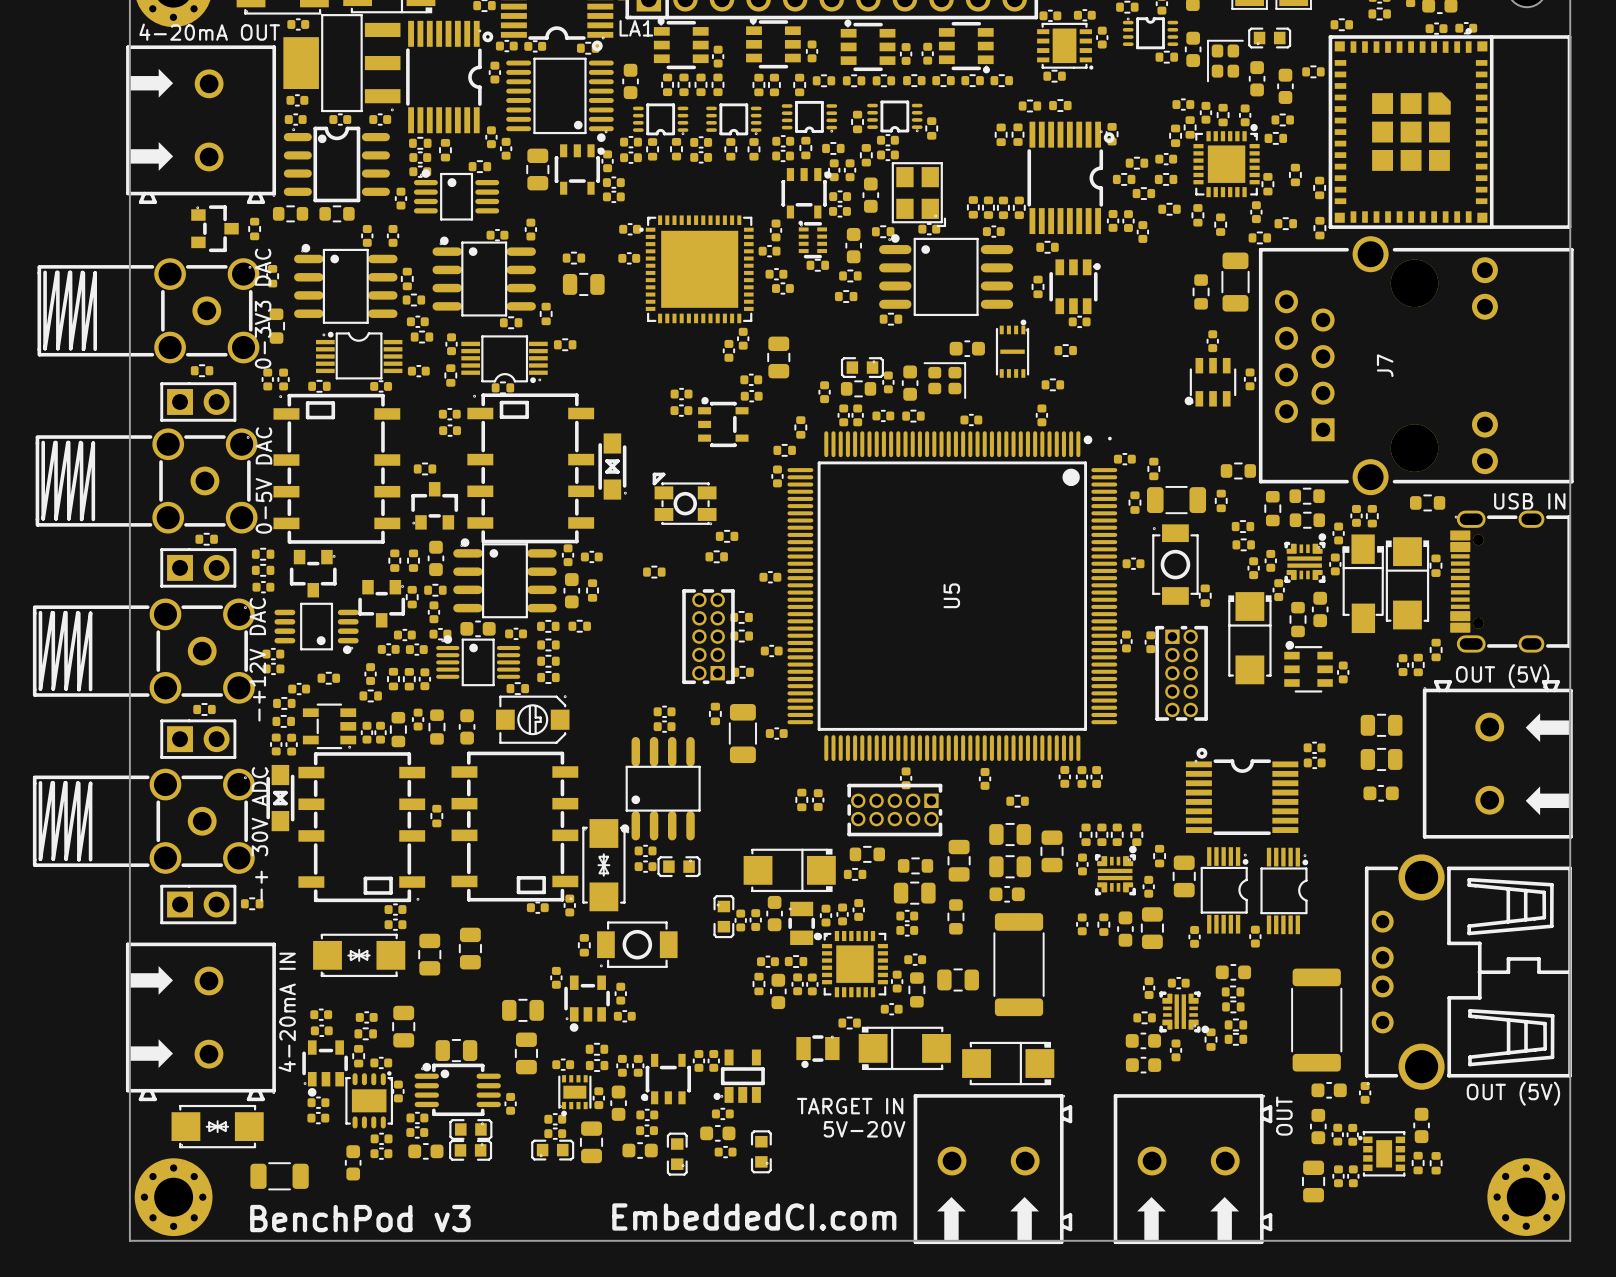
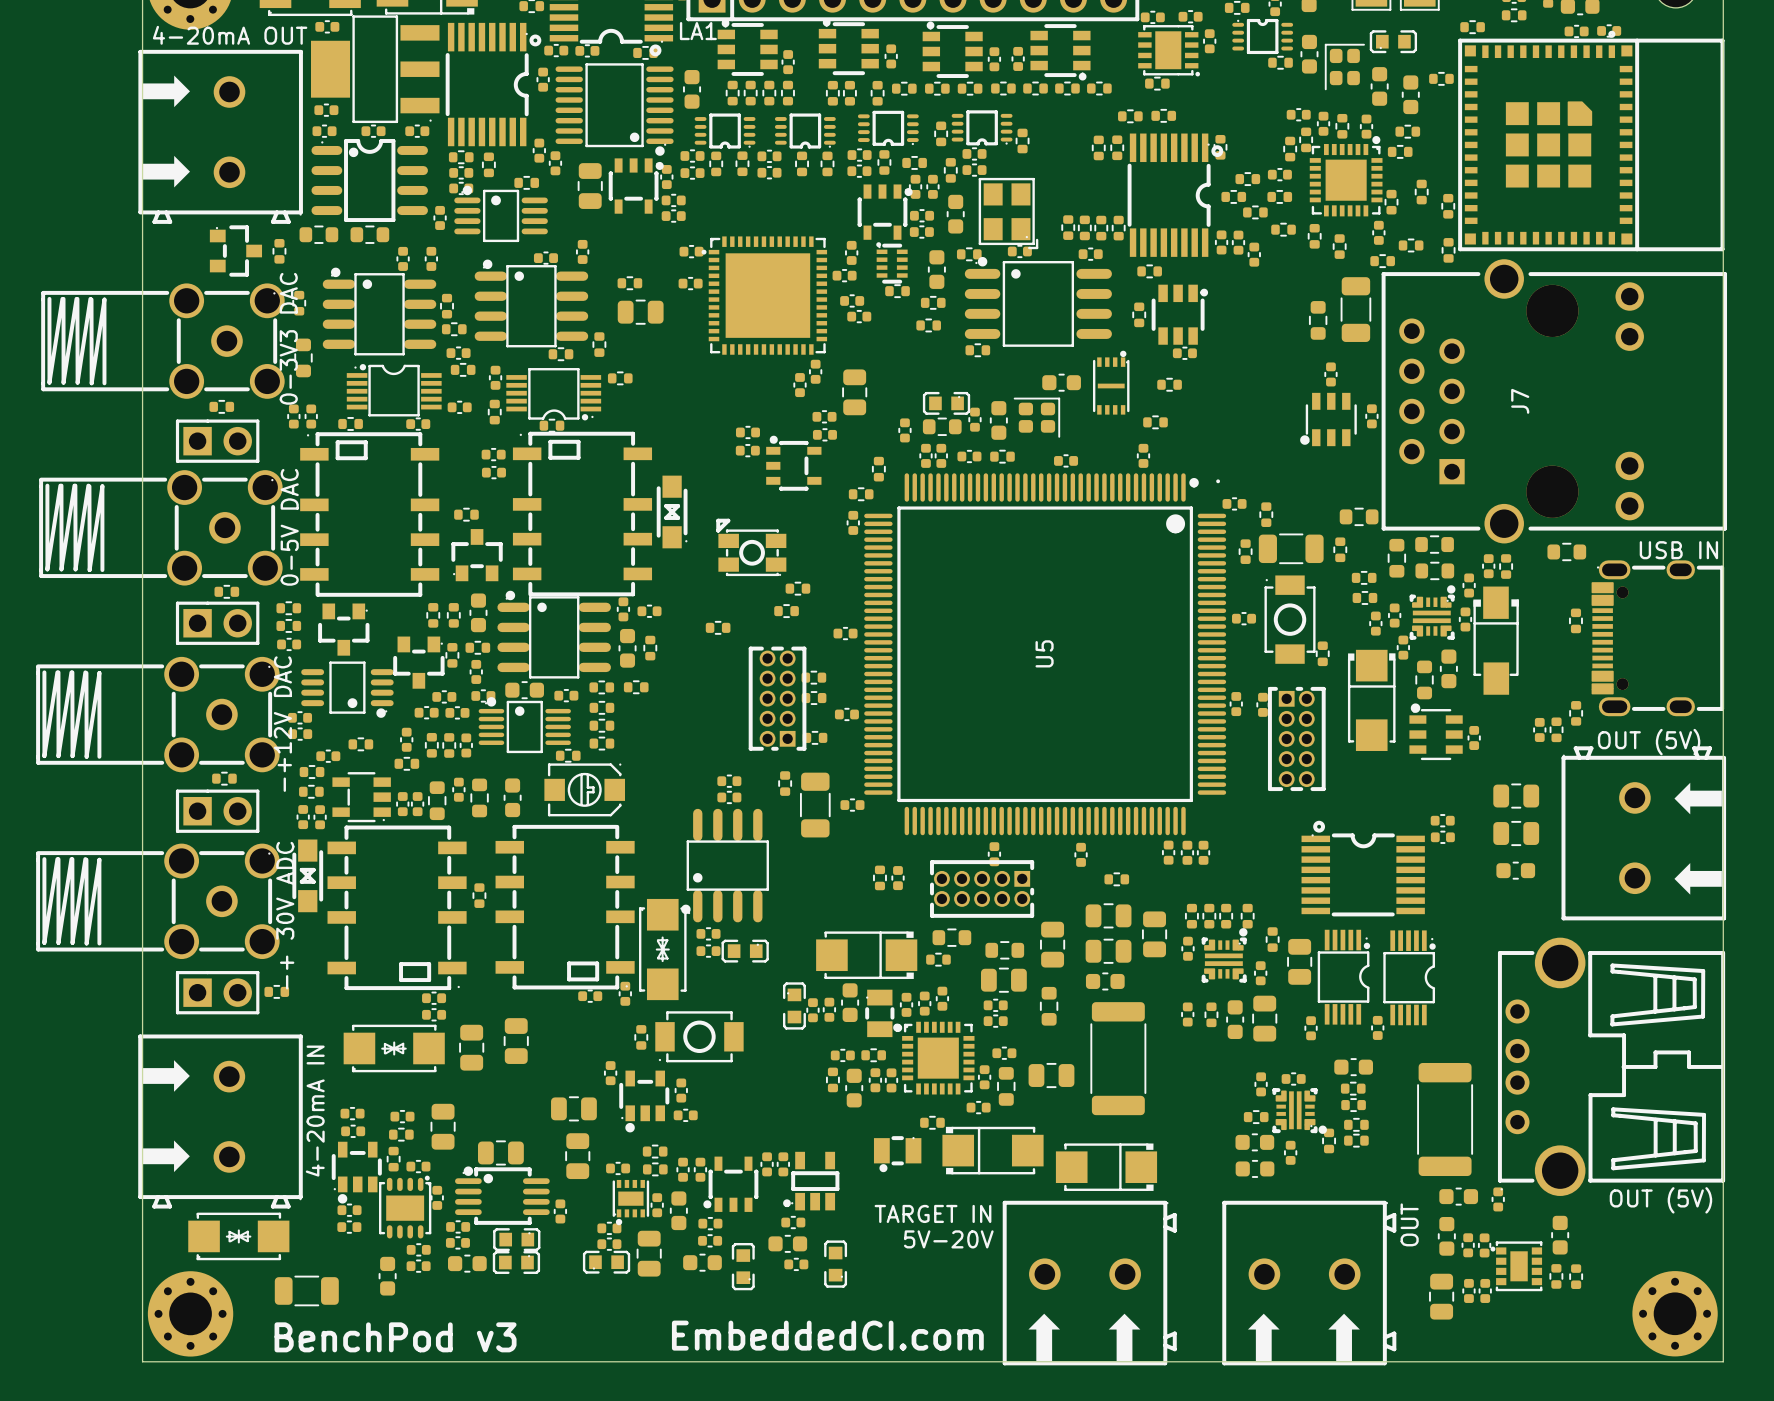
part: (1407, 583) -> none

